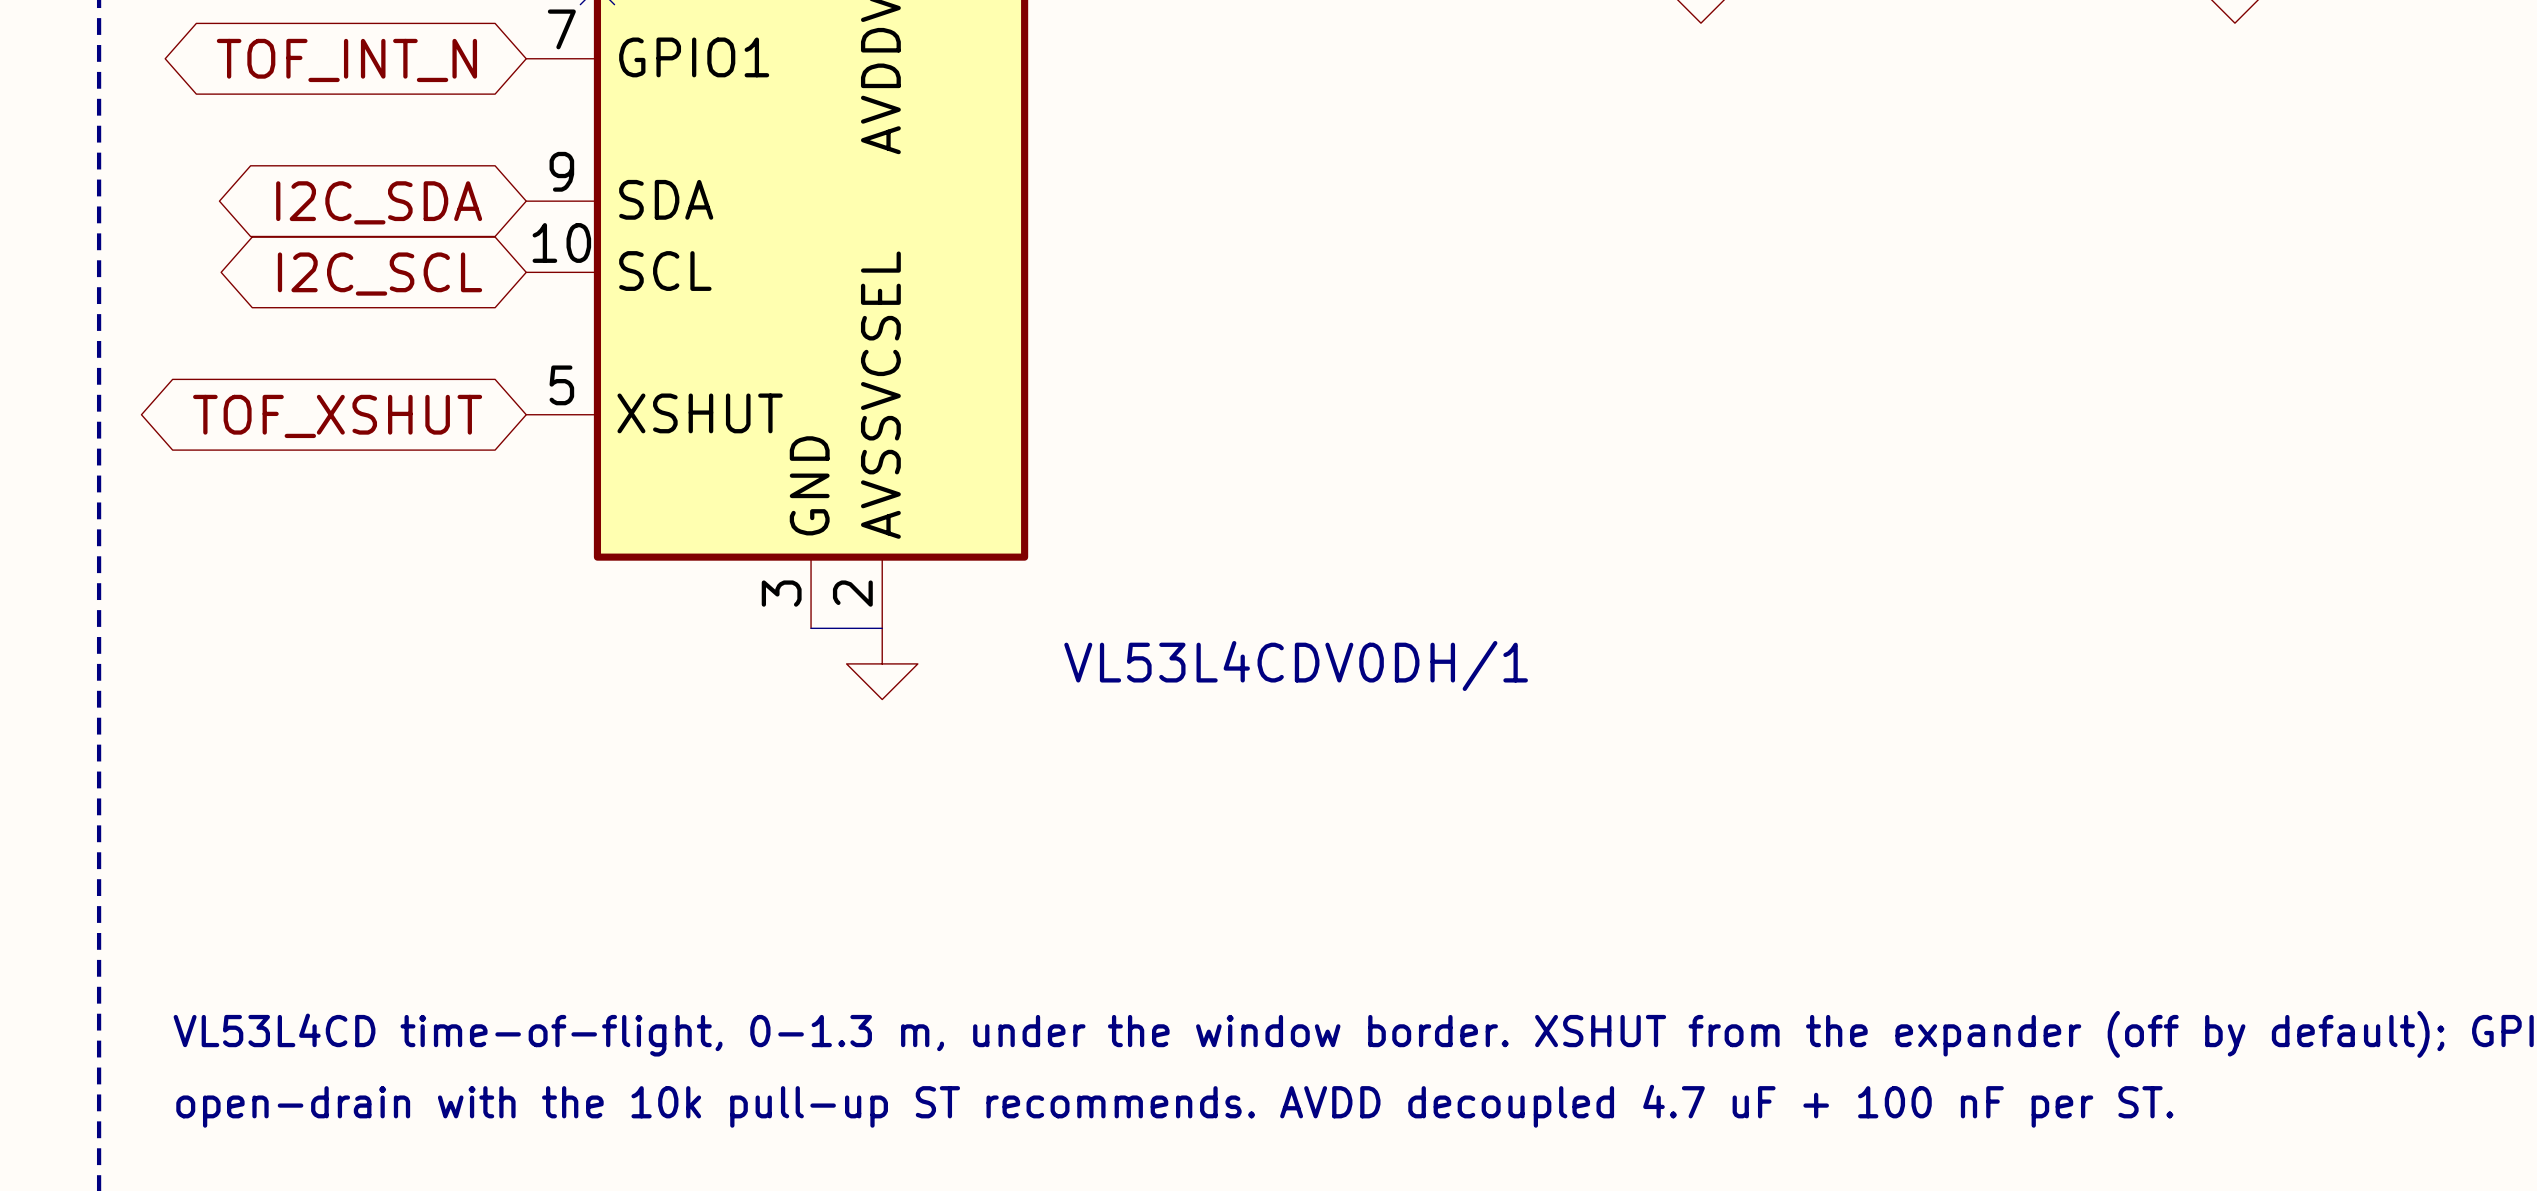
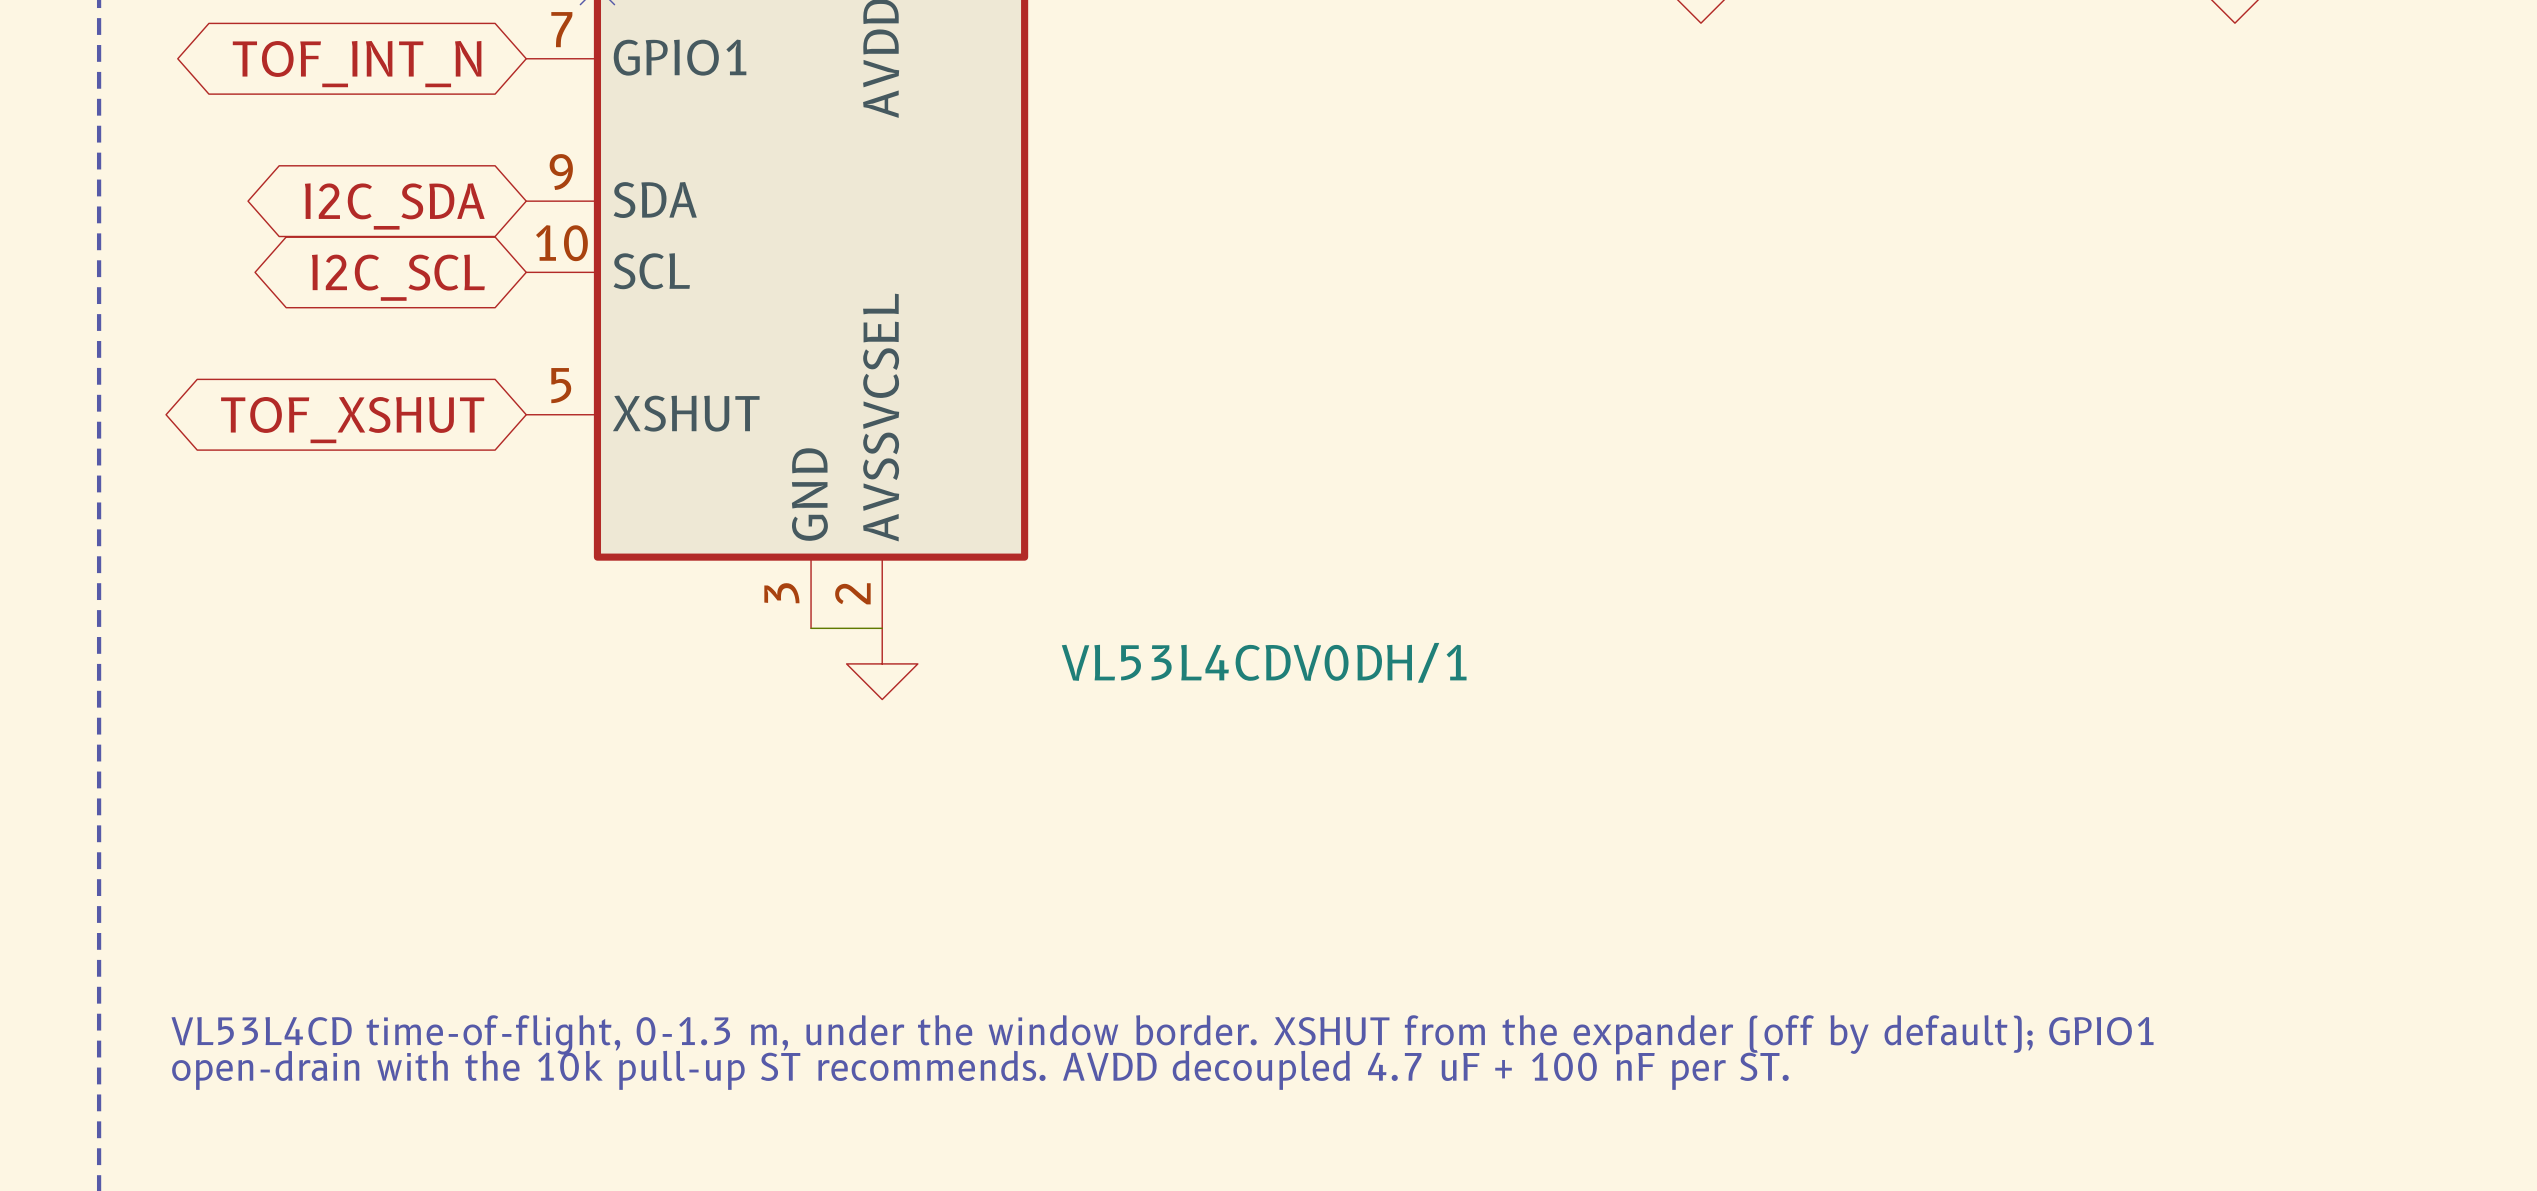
text position: open-drain with the 10k pull-up ST recommends. AVDD decoupled 4.7 uF + 100 nF per ST. (1174, 1106) -> open-drain with the 10k pull-up ST recommends. AVDD decoupled 4.7 uF + 100 nF per ST. (980, 1070)

